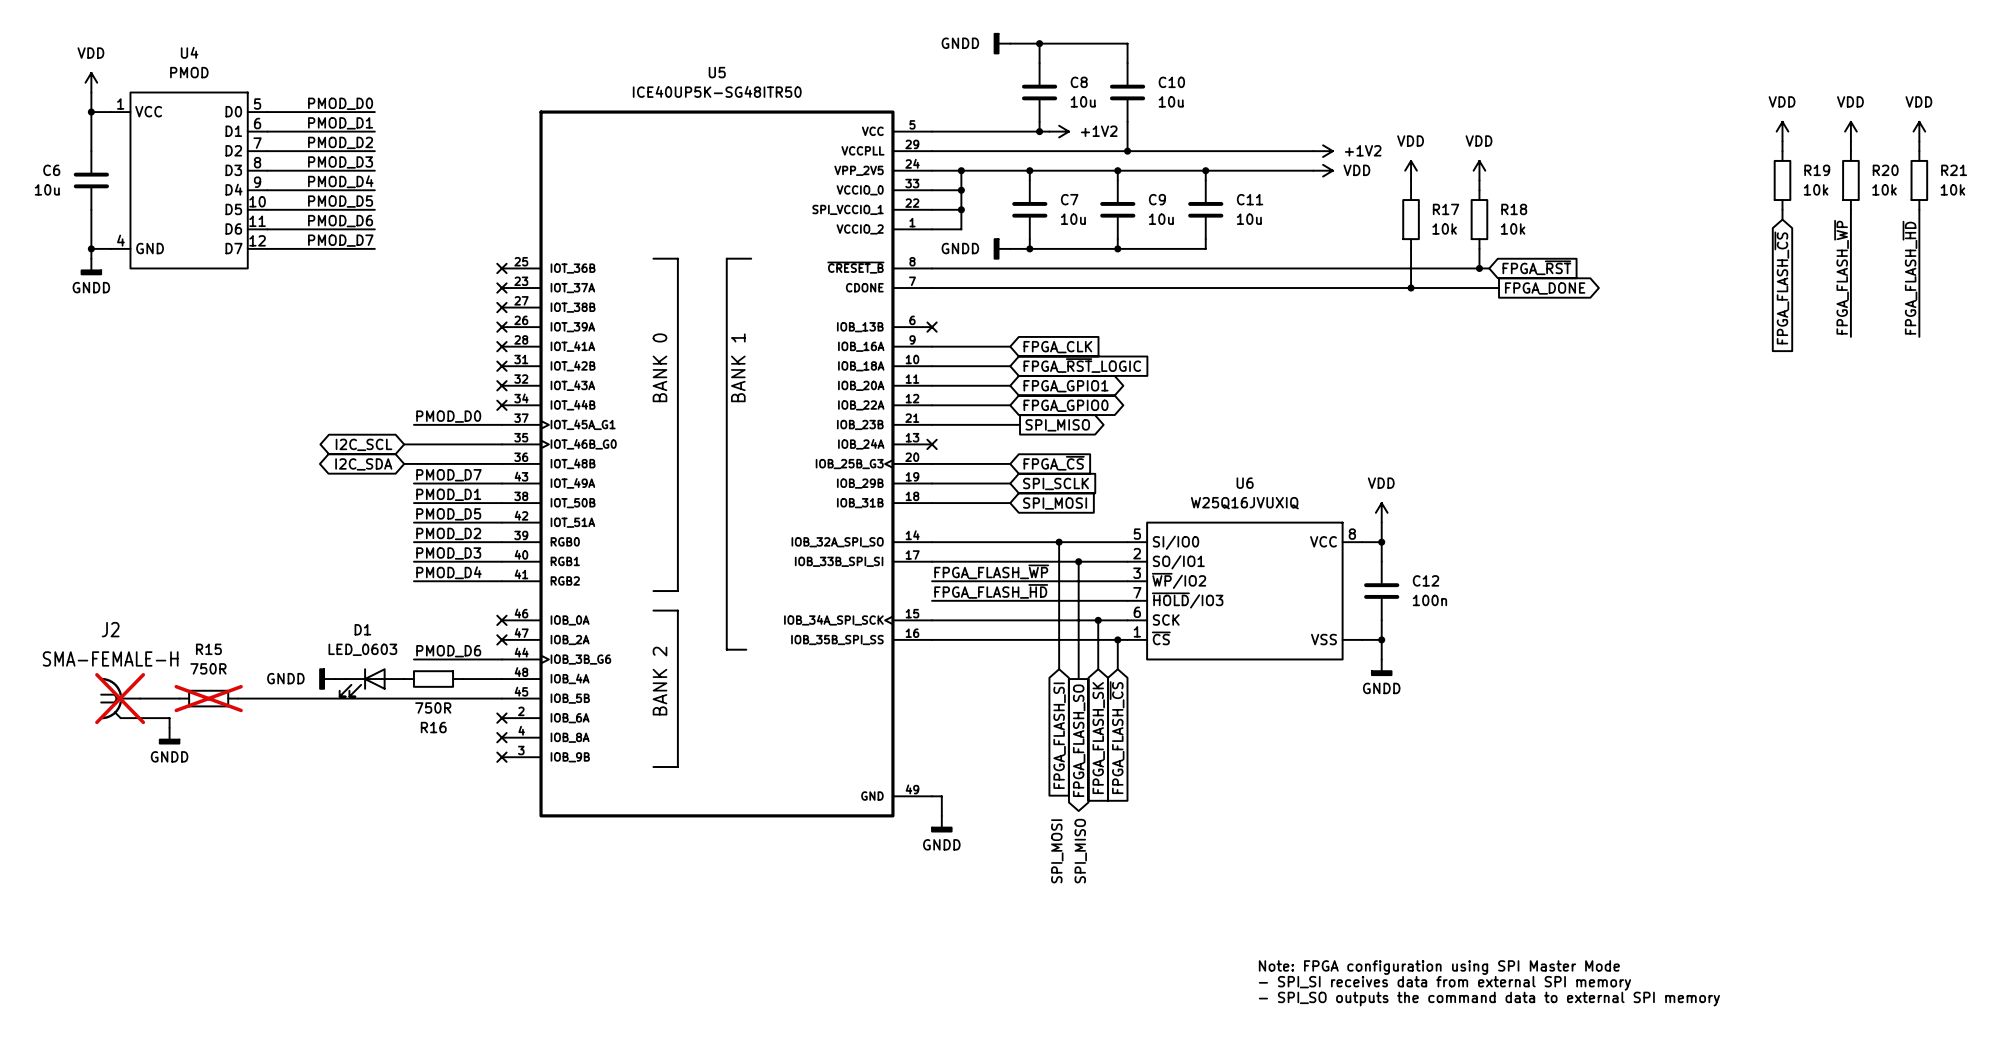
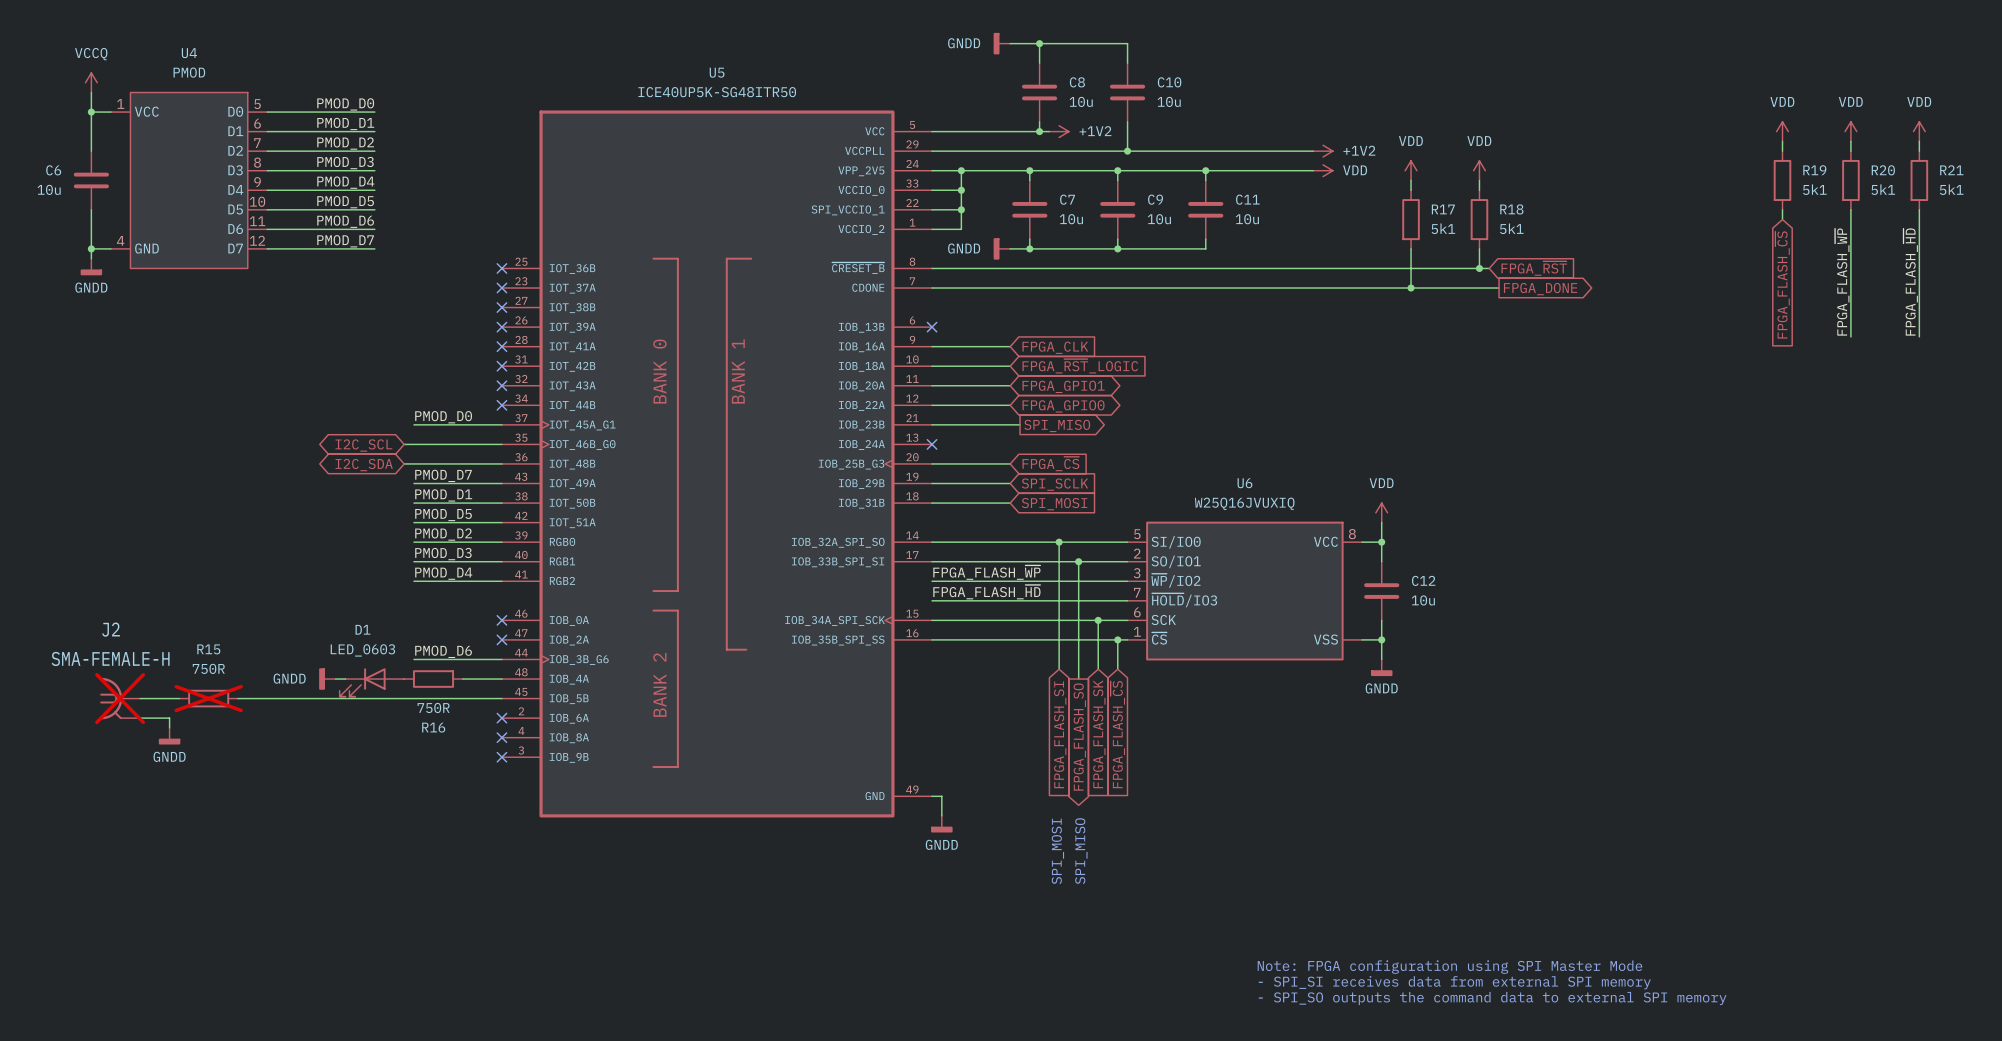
power symbol: VDD (91, 82) -> VCCQ (91, 82)
R19 value: 10k (1816, 189) -> 5k1 (1814, 189)
R20 value: 10k (1884, 189) -> 5k1 (1883, 189)
R21 value: 10k (1952, 189) -> 5k1 (1951, 189)
R17 value: 10k (1444, 228) -> 5k1 (1443, 228)
R18 value: 10k (1513, 228) -> 5k1 (1511, 228)
C12 value: 100n (1429, 600) -> 10u (1423, 600)

